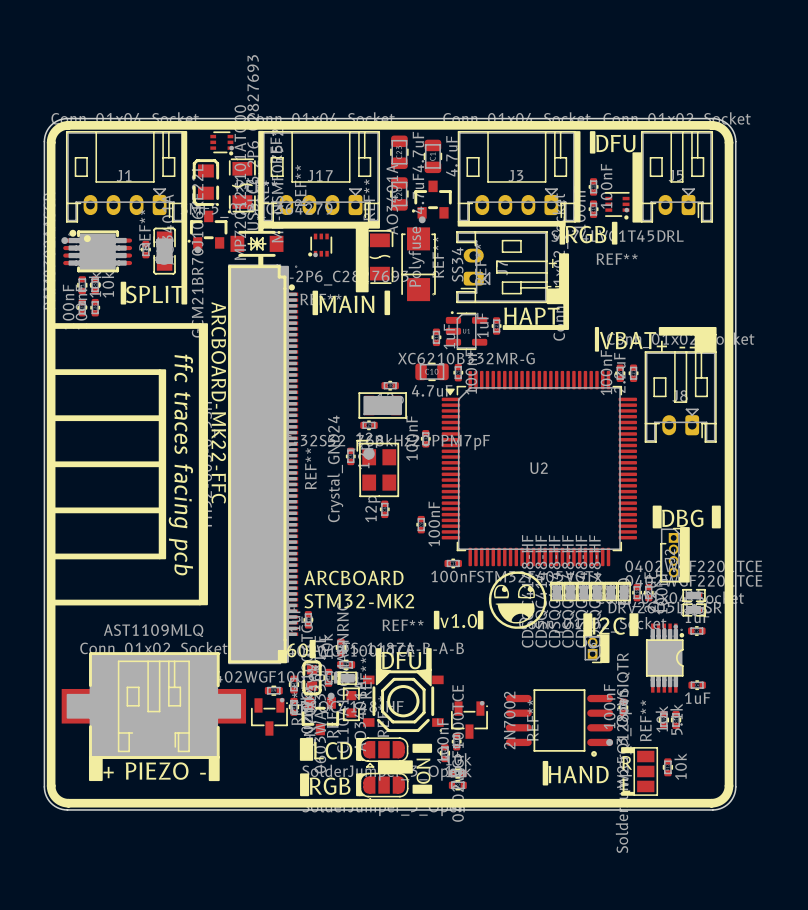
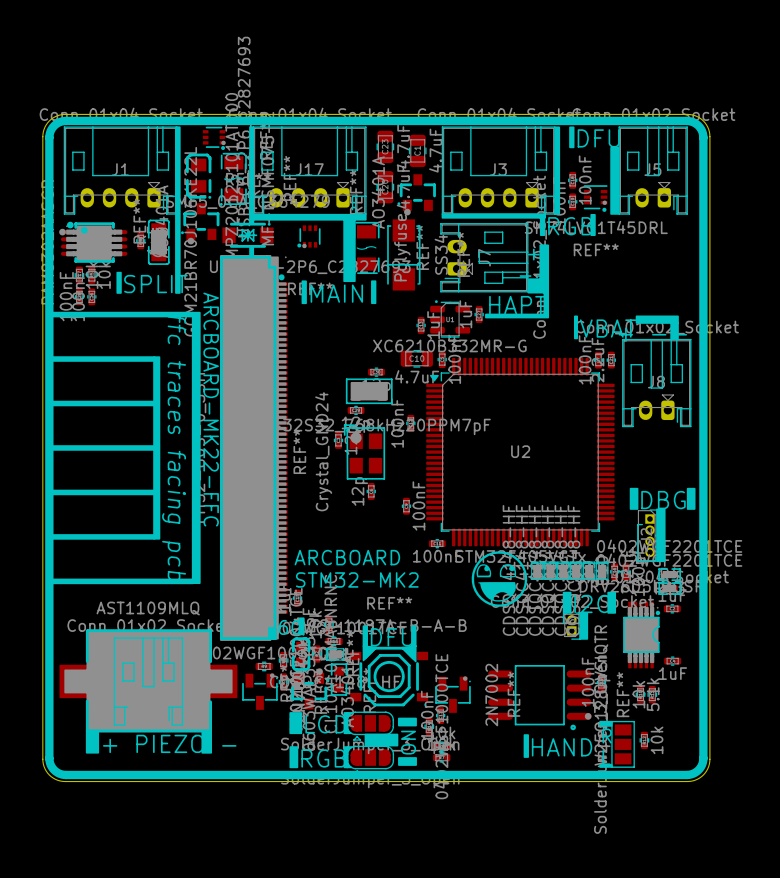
drawing shape: [658, 326, 717, 336] -> [635, 315, 679, 324]
drawing shape: [694, 333, 717, 353] -> [670, 322, 679, 340]
drawing: [433, 610, 440, 630] -> none
drawing: [477, 610, 484, 630] -> none
text: v1.0 (458, 621) -> none

